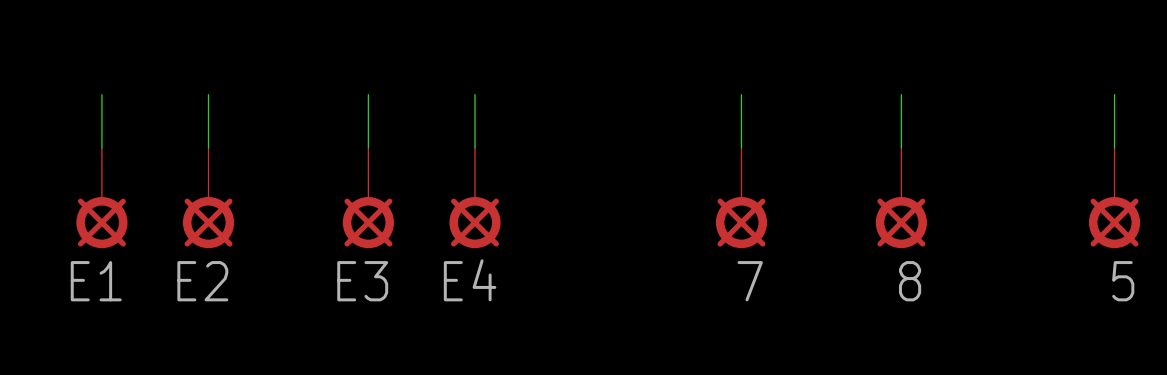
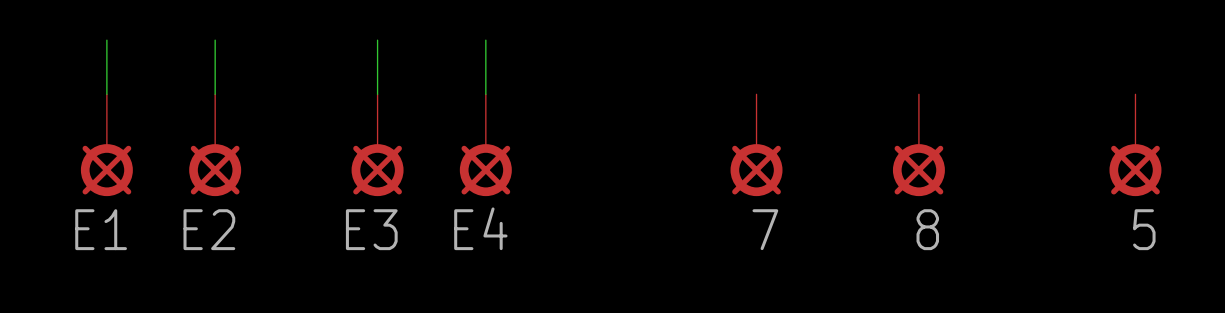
wire: (741, 94) (741, 147) -> none
wire: (901, 94) (901, 147) -> none
wire: (1114, 94) (1114, 147) -> none

